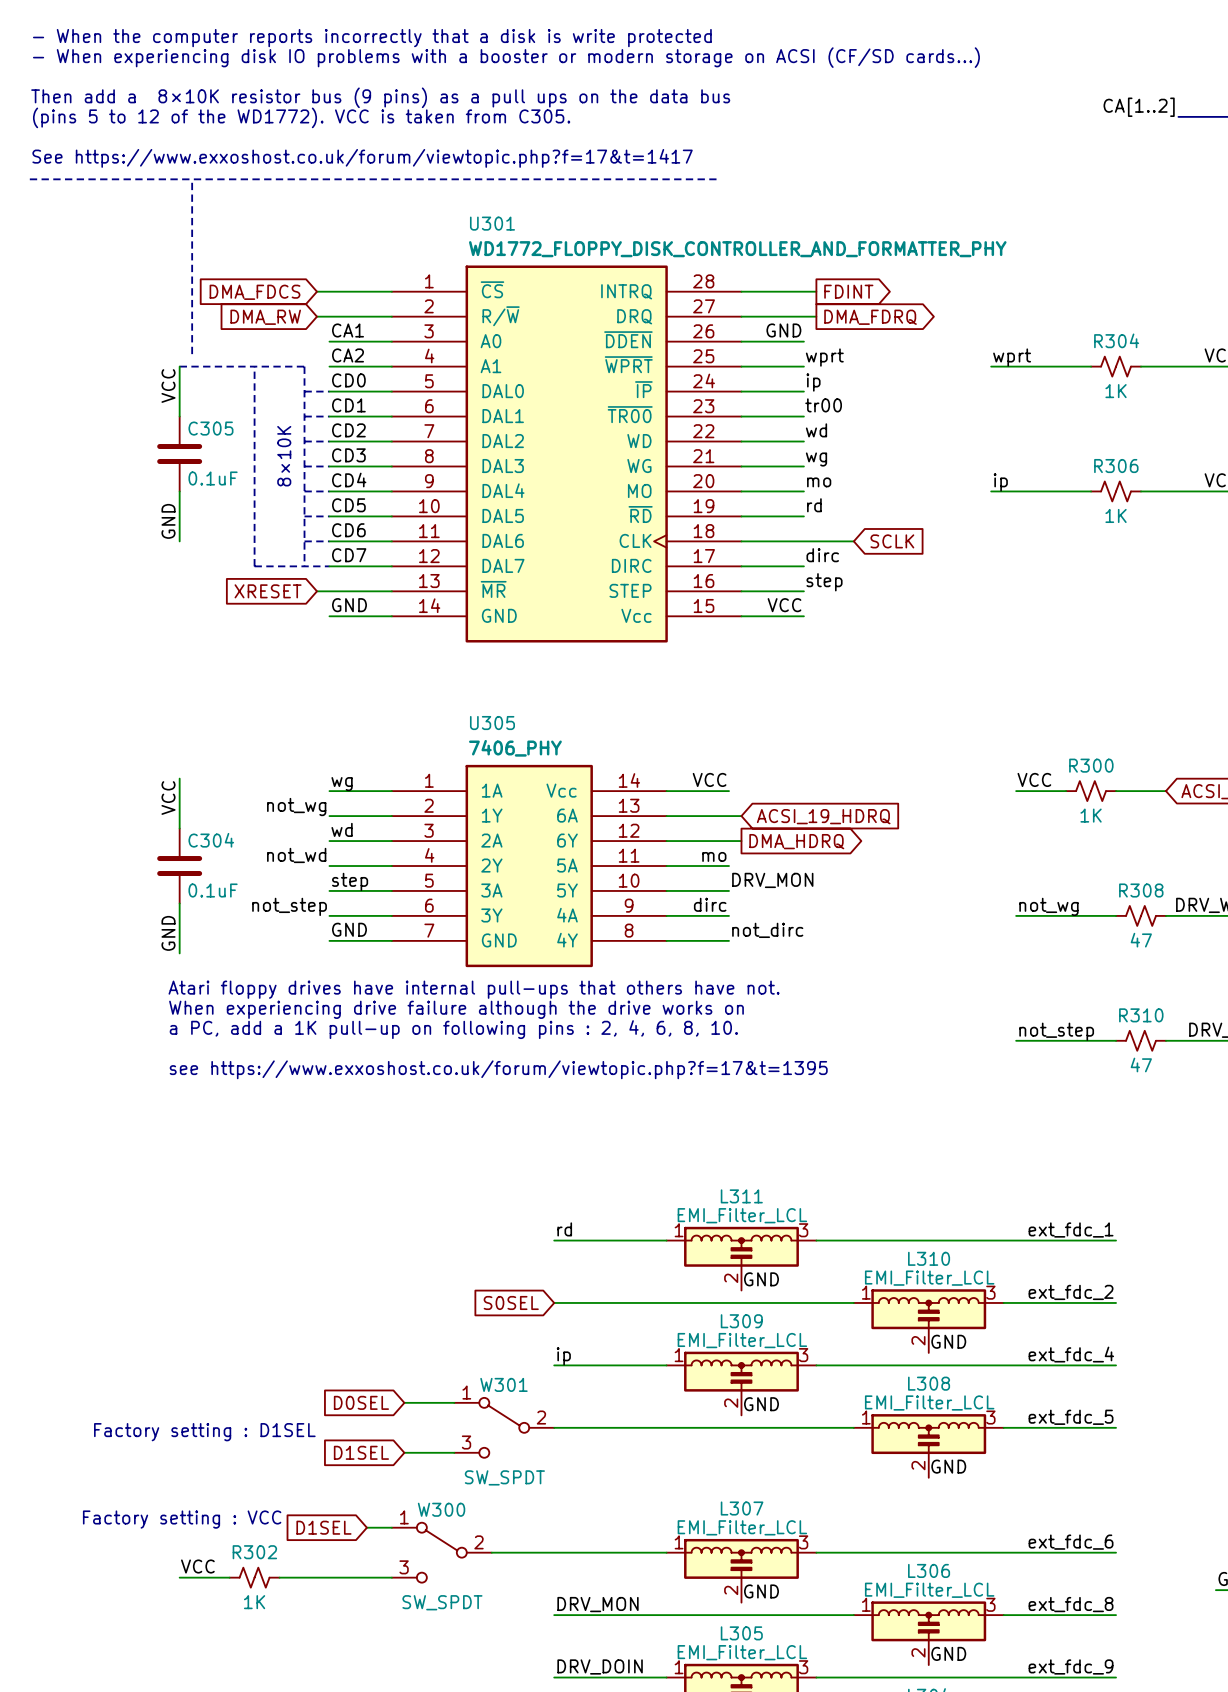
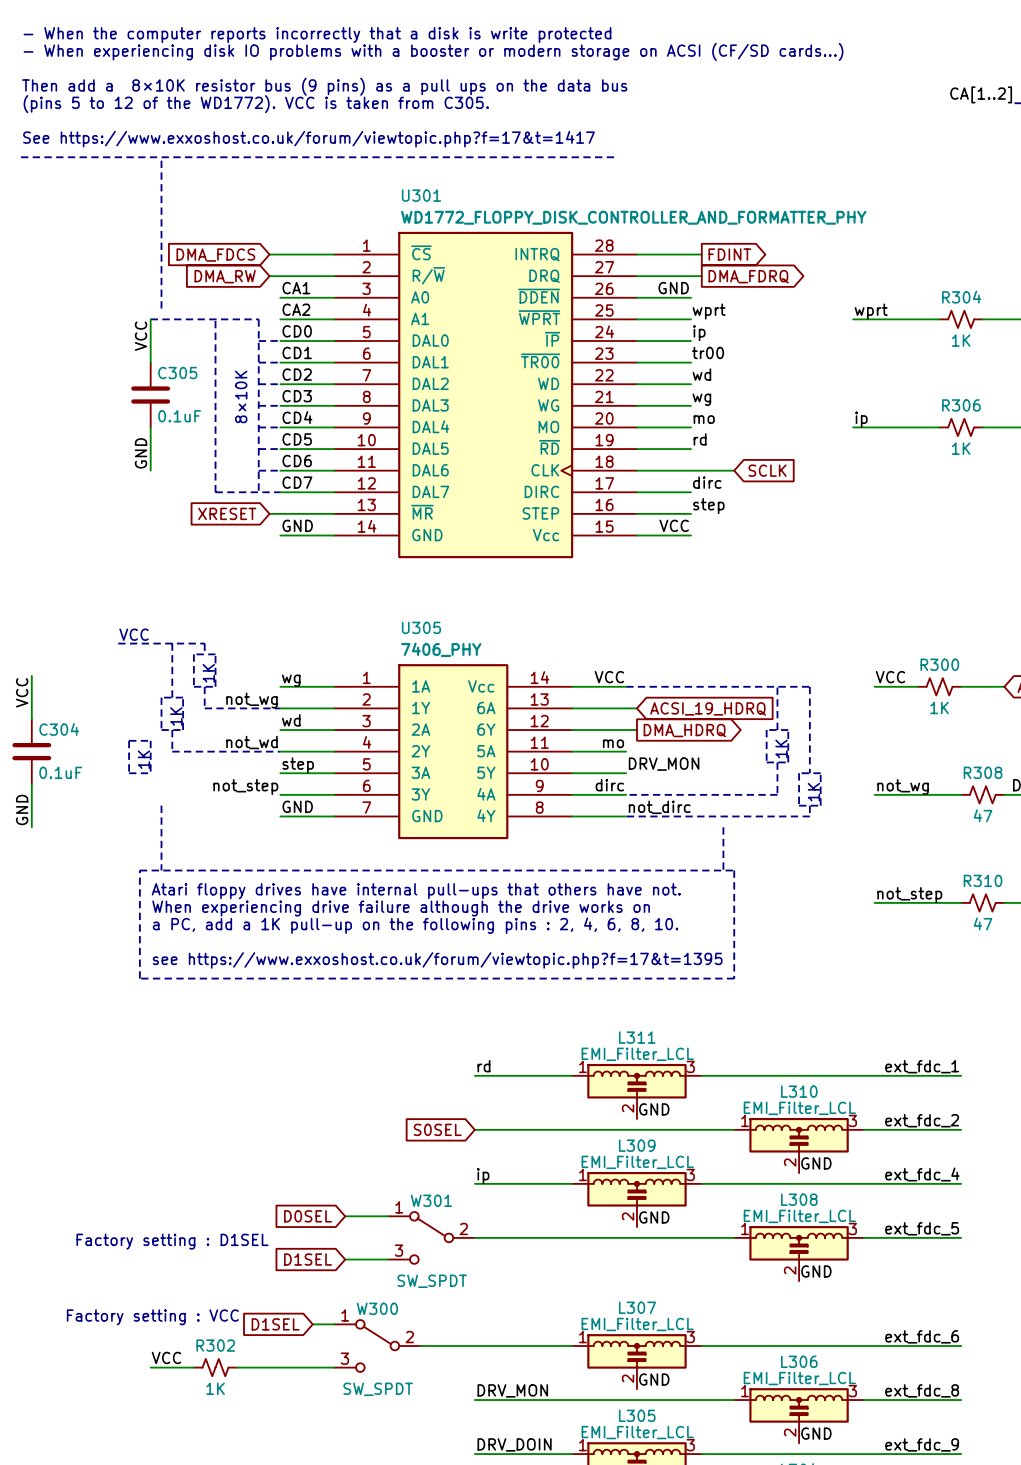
text: none -> VCC (134, 634)
line: none -> (118, 643) (204, 643) (204, 654)
line: none -> (172, 643) (172, 697)
line: none -> (193, 654) (215, 654) (215, 686) (193, 686) (193, 654)
text: none -> 1K (208, 673)
wire: (179, 778) (179, 828) -> (31, 675) (31, 719)
line: none -> (204, 686) (204, 708) (280, 708)
line: none -> (626, 686) (809, 686) (809, 773)
line: none -> (777, 686) (777, 730)
label position: VCC (168, 798) -> VCC (22, 692)
line: none -> (161, 697) (183, 697) (183, 730) (161, 730) (161, 697)
text: none -> 1K (176, 716)
line: none -> (172, 730) (172, 751) (280, 751)
line: none -> (766, 730) (788, 730) (788, 762) (766, 762) (766, 730)
line: none -> (129, 740) (129, 773) (150, 773) (150, 740) (129, 740)
text: none -> 1K (781, 748)
C304 position: (179, 866) -> (31, 751)
text: none -> 1K (143, 759)
line: none -> (777, 762) (777, 794) (626, 794)
line: none -> (799, 773) (820, 773) (820, 805) (799, 805) (799, 773)
wire: (179, 903) (179, 953) -> (31, 784) (31, 827)
text: none -> 1K (813, 792)
line: none -> (161, 805) (161, 870)
line: none -> (809, 805) (809, 816) (626, 816)
label position: GND (168, 933) -> GND (22, 809)
line: none -> (723, 827) (723, 870)
text position: Atari floppy drives have internal pull-ups that others have not. (474, 989) -> Atari floppy drives have internal pull-ups that others have not. (416, 891)
line: none -> (139, 870) (734, 870) (734, 978) (139, 978) (139, 870)
text position: When experiencing drive failure although the drive works on (456, 1009) -> When experiencing drive failure although the drive works on (401, 908)
text: a PC, add a 1K pull-up on following pins : 2, 4, 6, 8, 10. (453, 1029) -> none
text: none -> a PC, add a 1K pull-up on the following pins : 2, 4, 6, 8, 10. (415, 925)
text position: see https://www.exxoshost.co.uk/forum/viewtopic.php?f=17&t=1395 (498, 1069) -> see https://www.exxoshost.co.uk/forum/viewtopic.php?f=17&t=1395 (437, 960)

